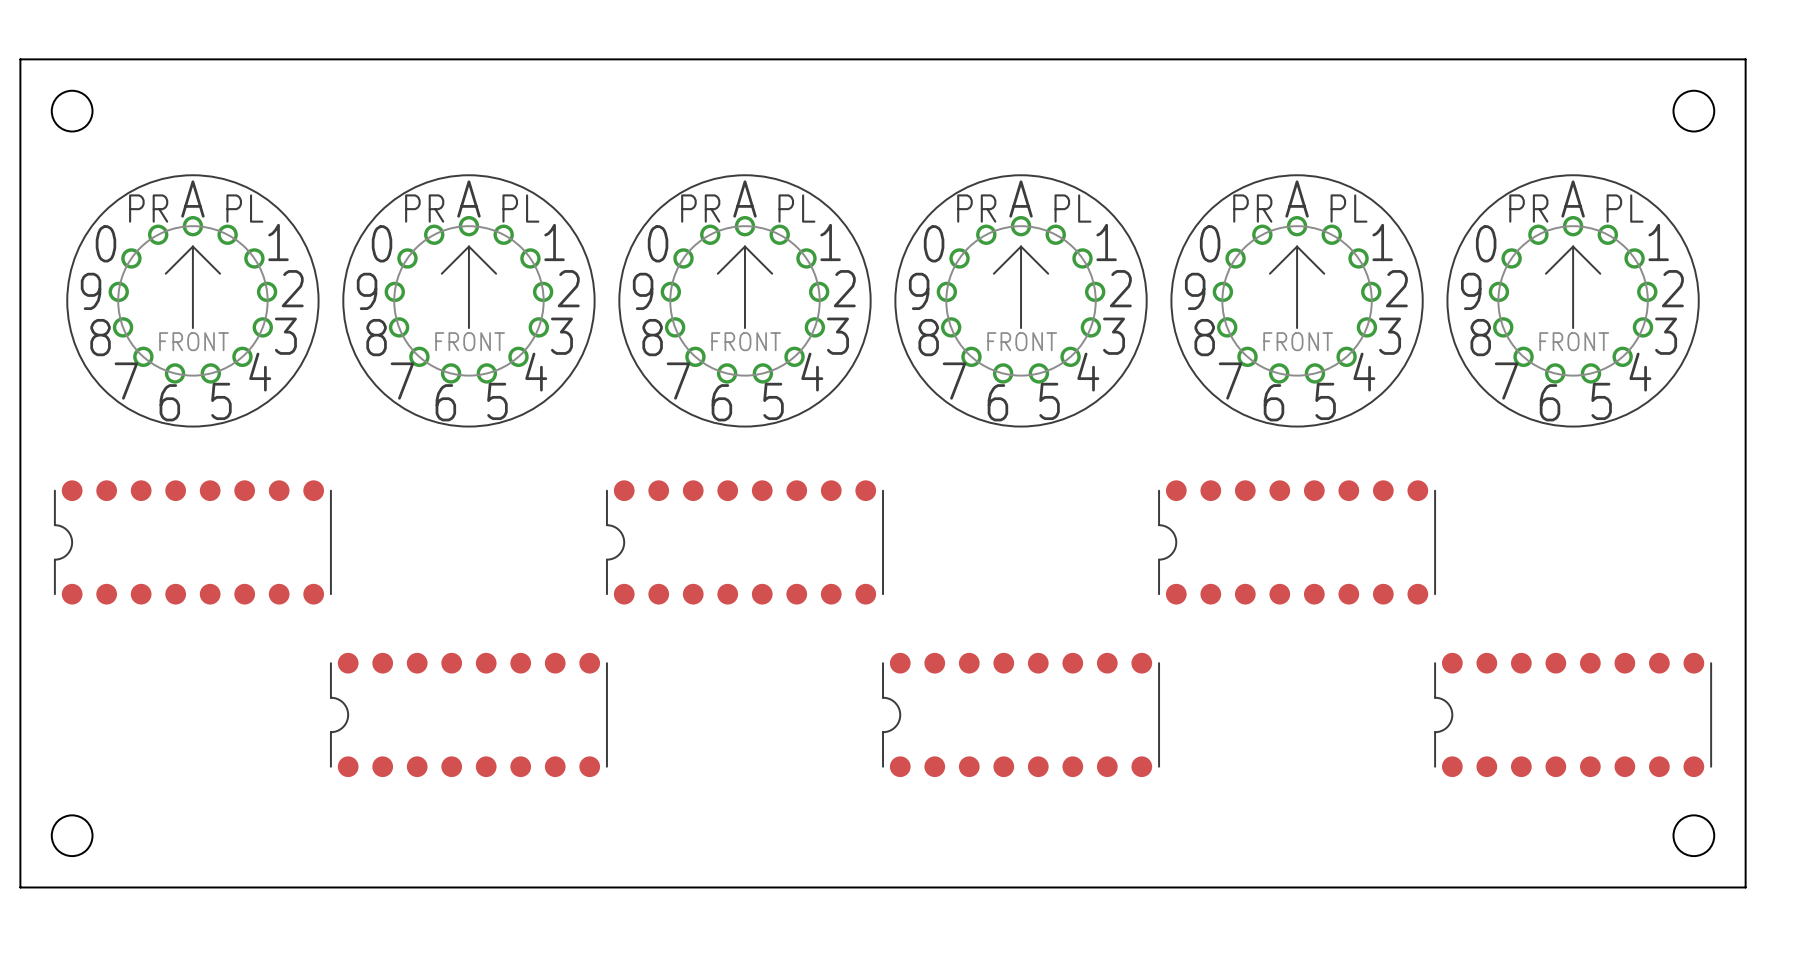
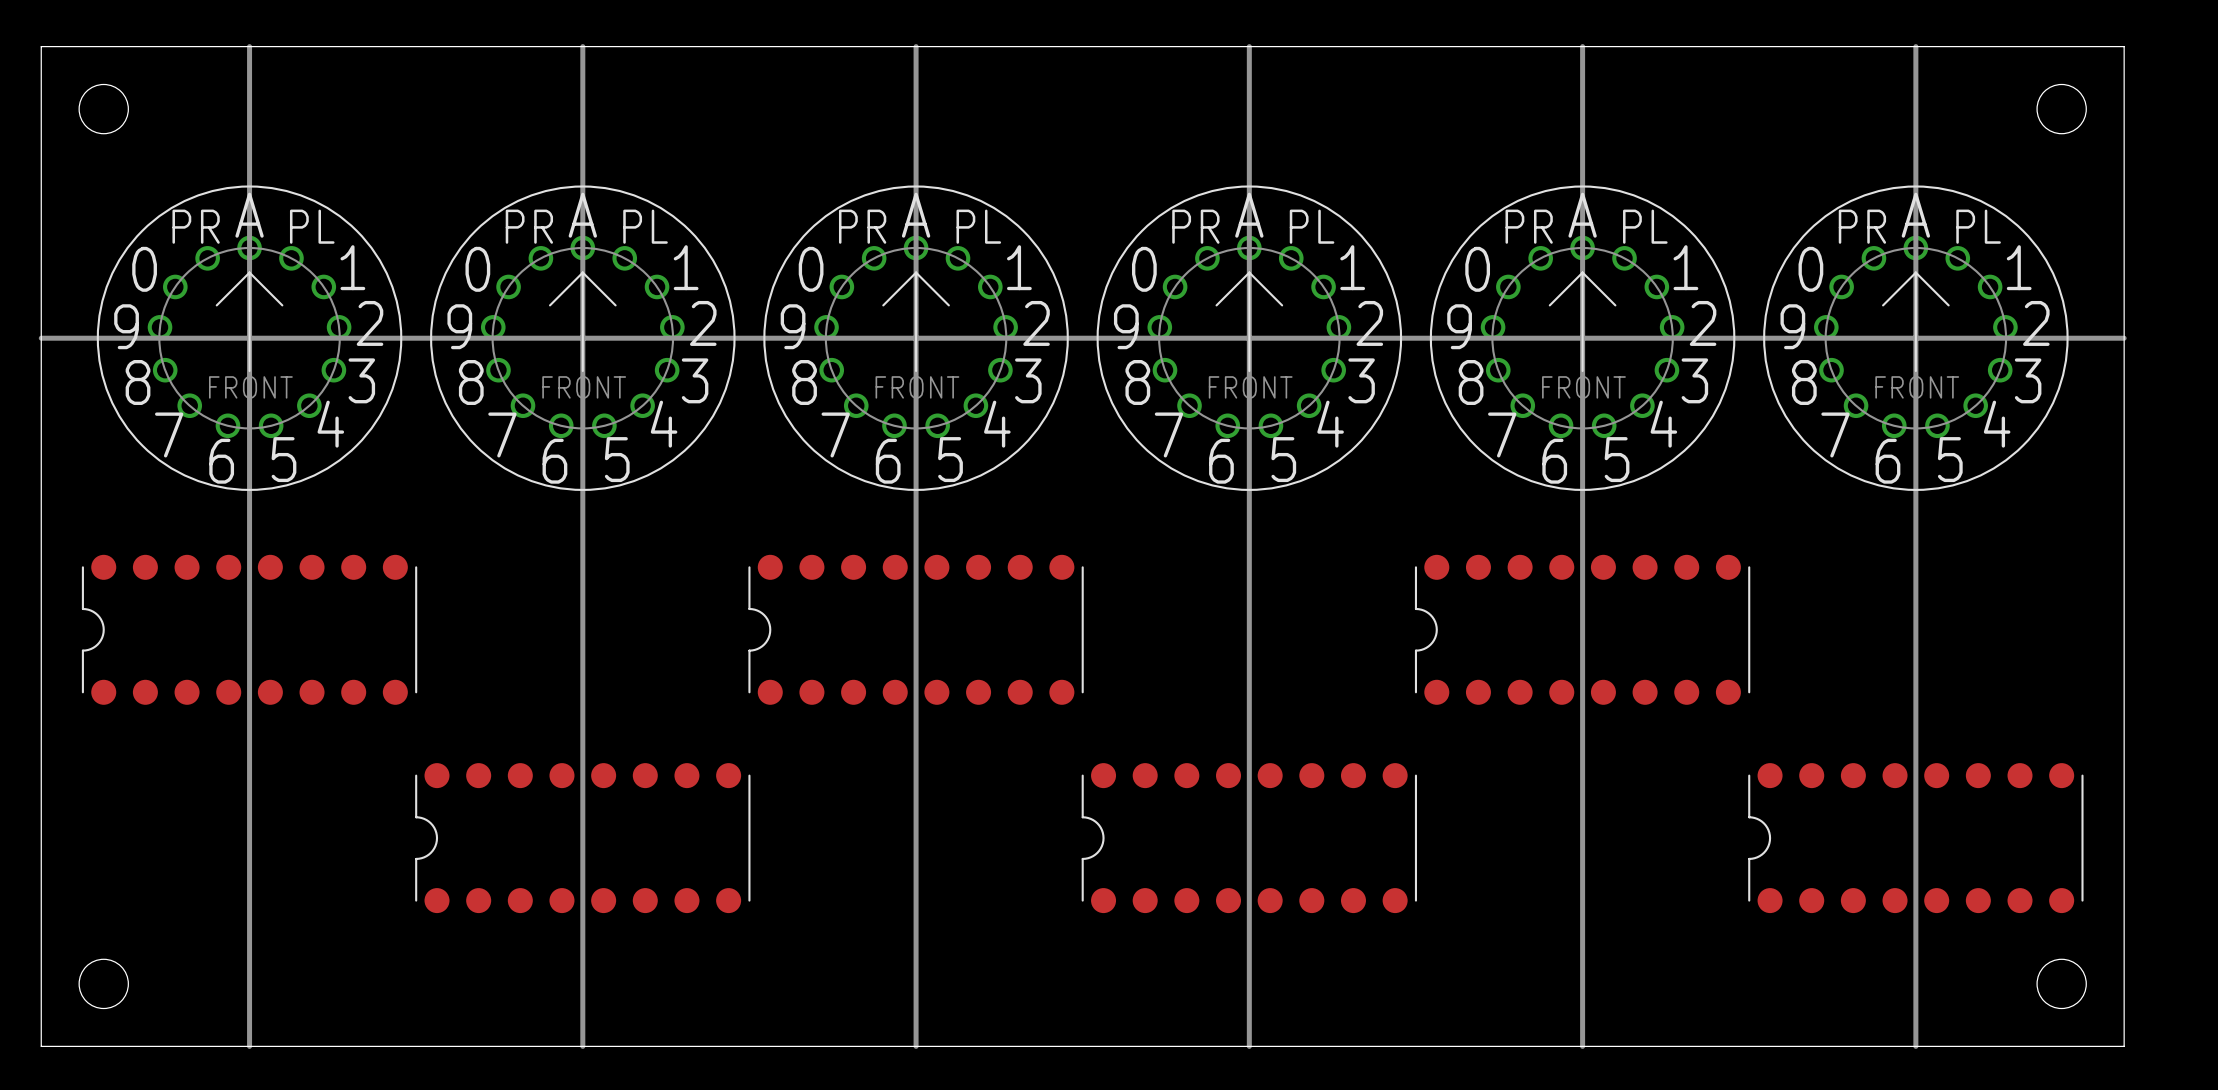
line: none -> (249, 46) (249, 1046)
line: none -> (582, 46) (582, 1046)
line: none -> (916, 46) (916, 1046)
line: none -> (1249, 46) (1249, 1046)
line: none -> (1582, 46) (1582, 1046)
line: none -> (1915, 46) (1915, 1046)
line: none -> (41, 338) (2124, 338)

